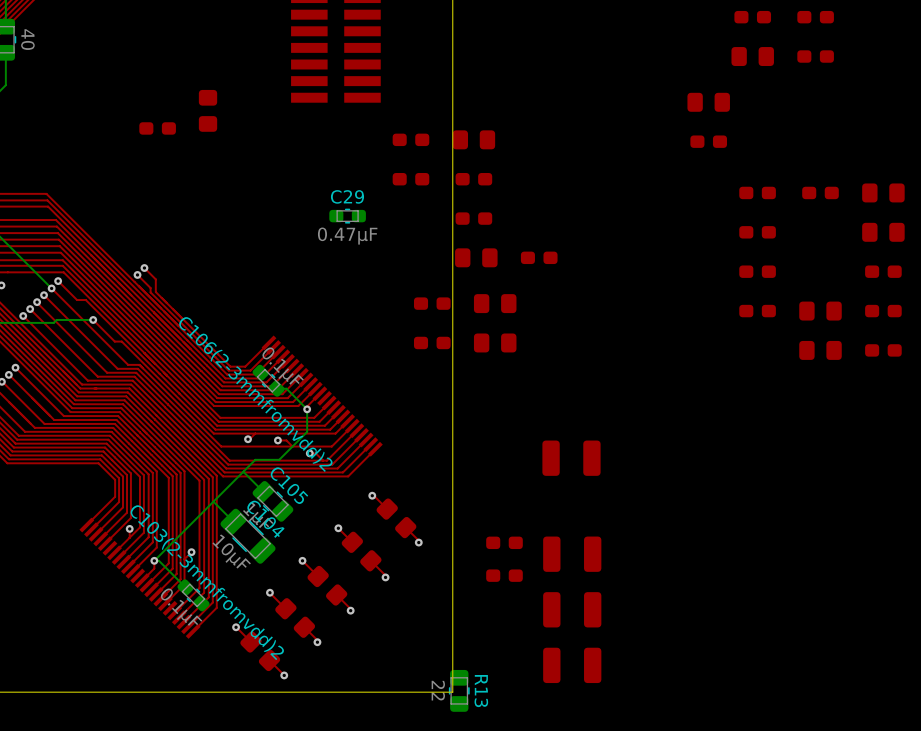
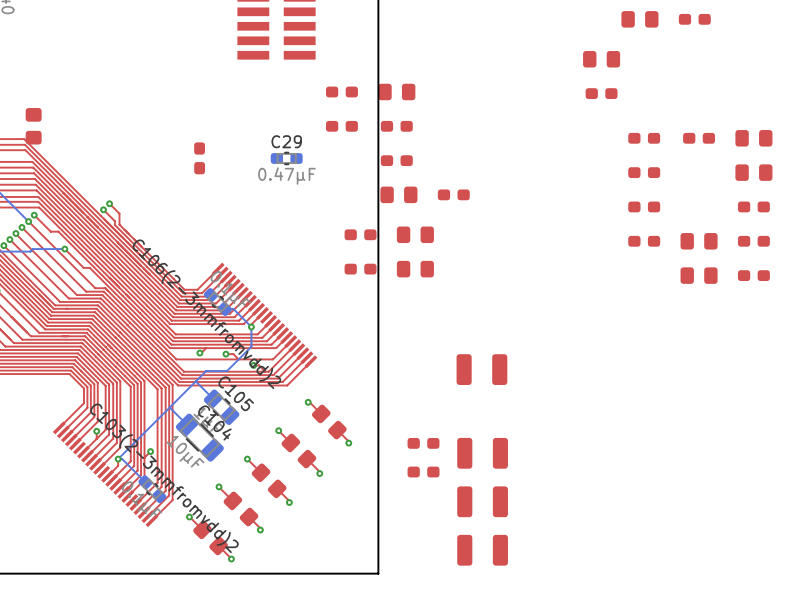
part position: (208, 110) -> (33, 126)
part rotation: 0° (157, 128) -> 90° clockwise (199, 158)
part position: (157, 128) -> (199, 158)
R13: 22 (459, 690) -> none

